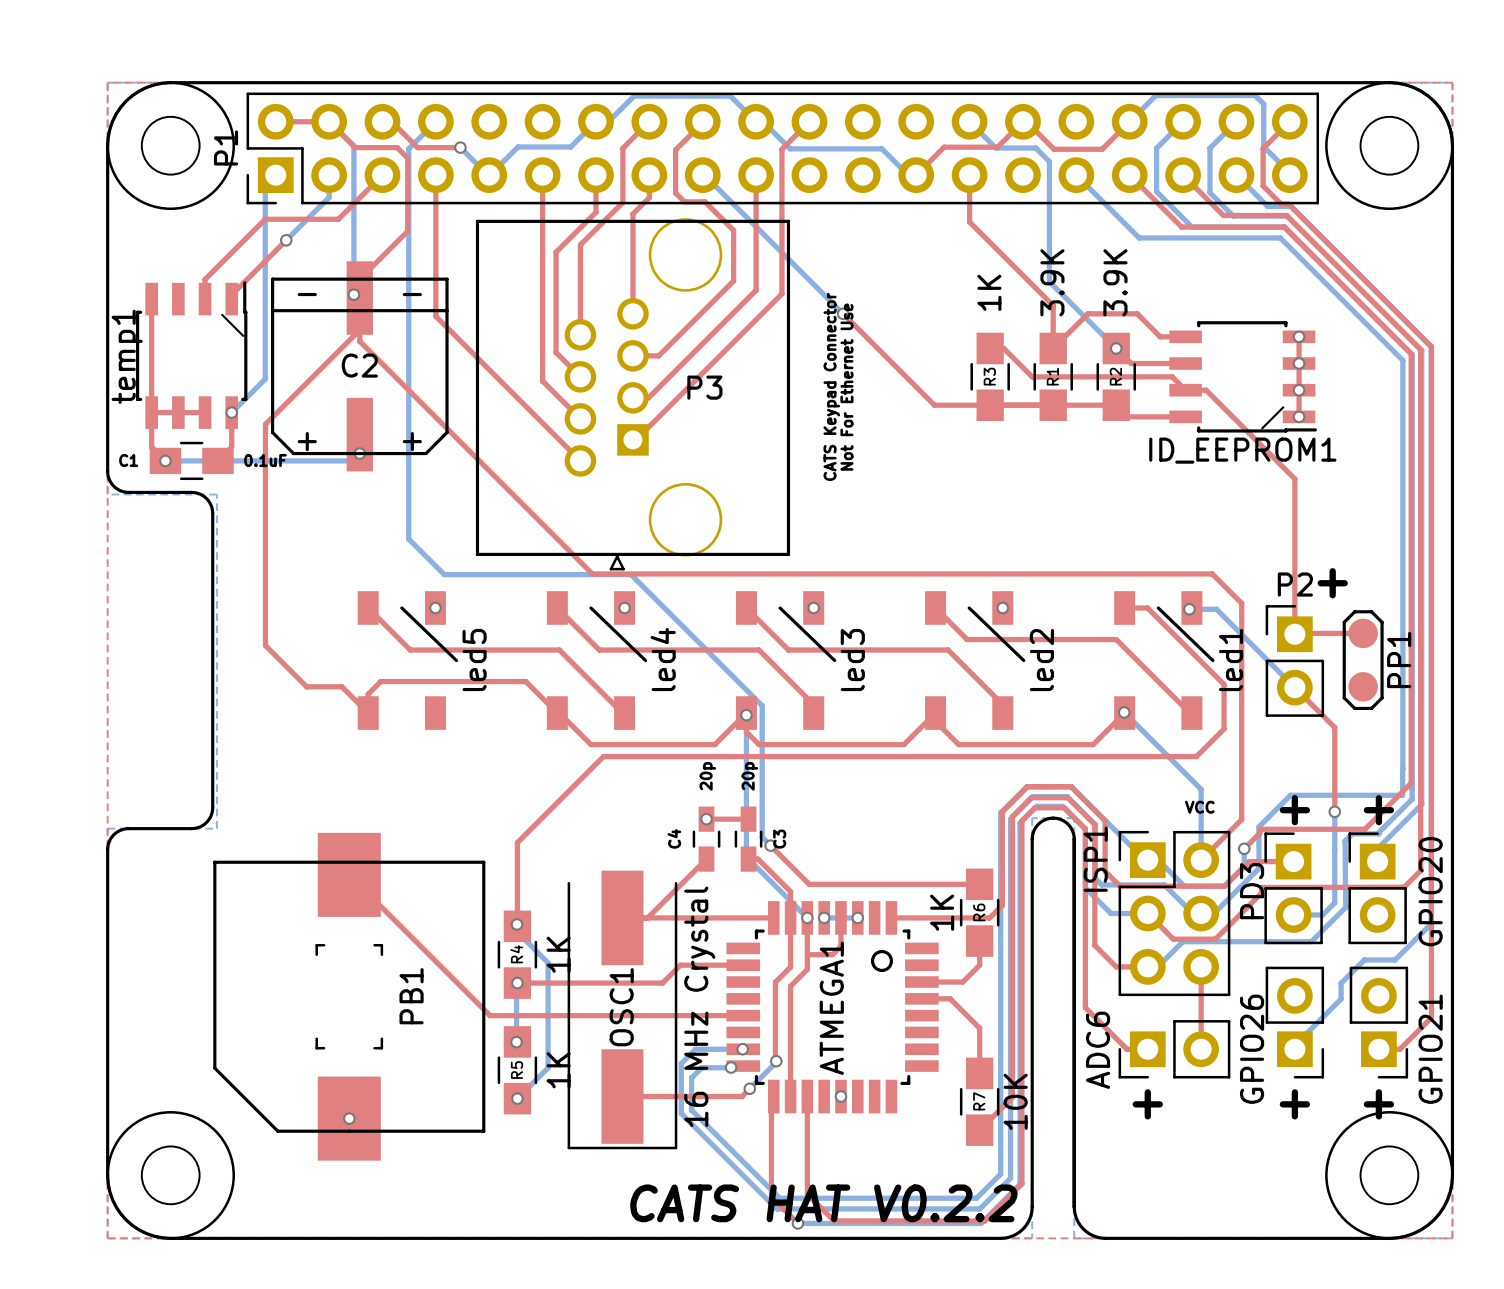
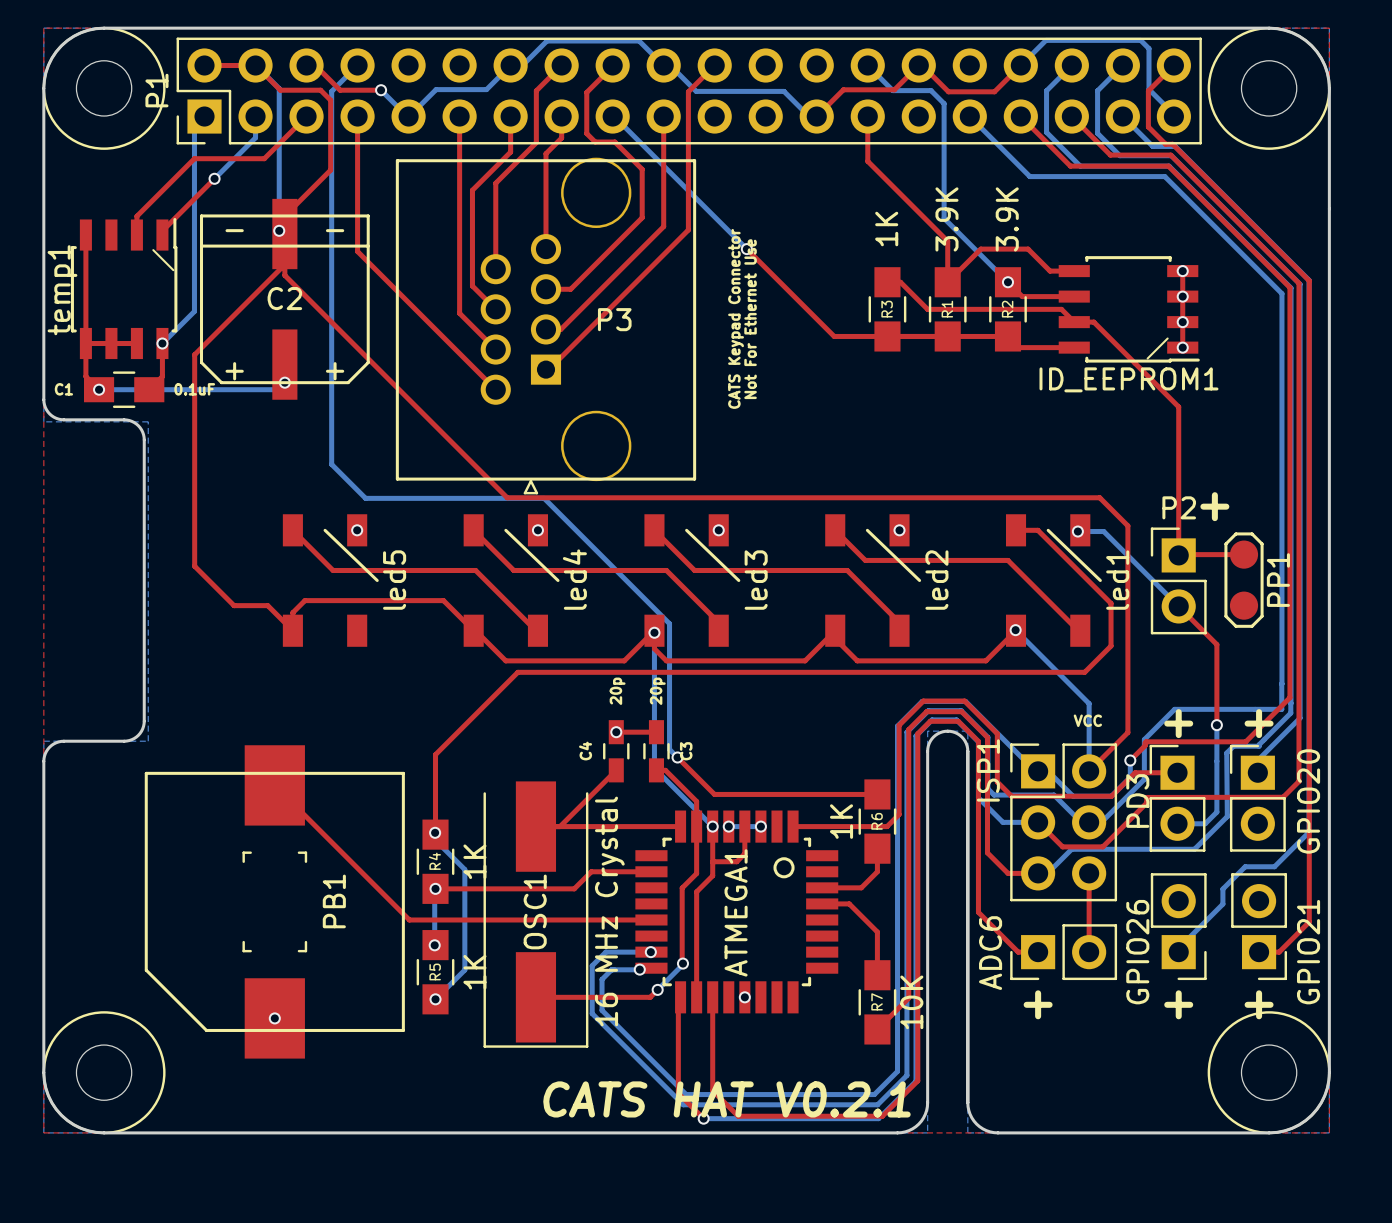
text: CATS HAT V0.2.2 (823, 1203) -> CATS HAT V0.2.1 (726, 1099)

